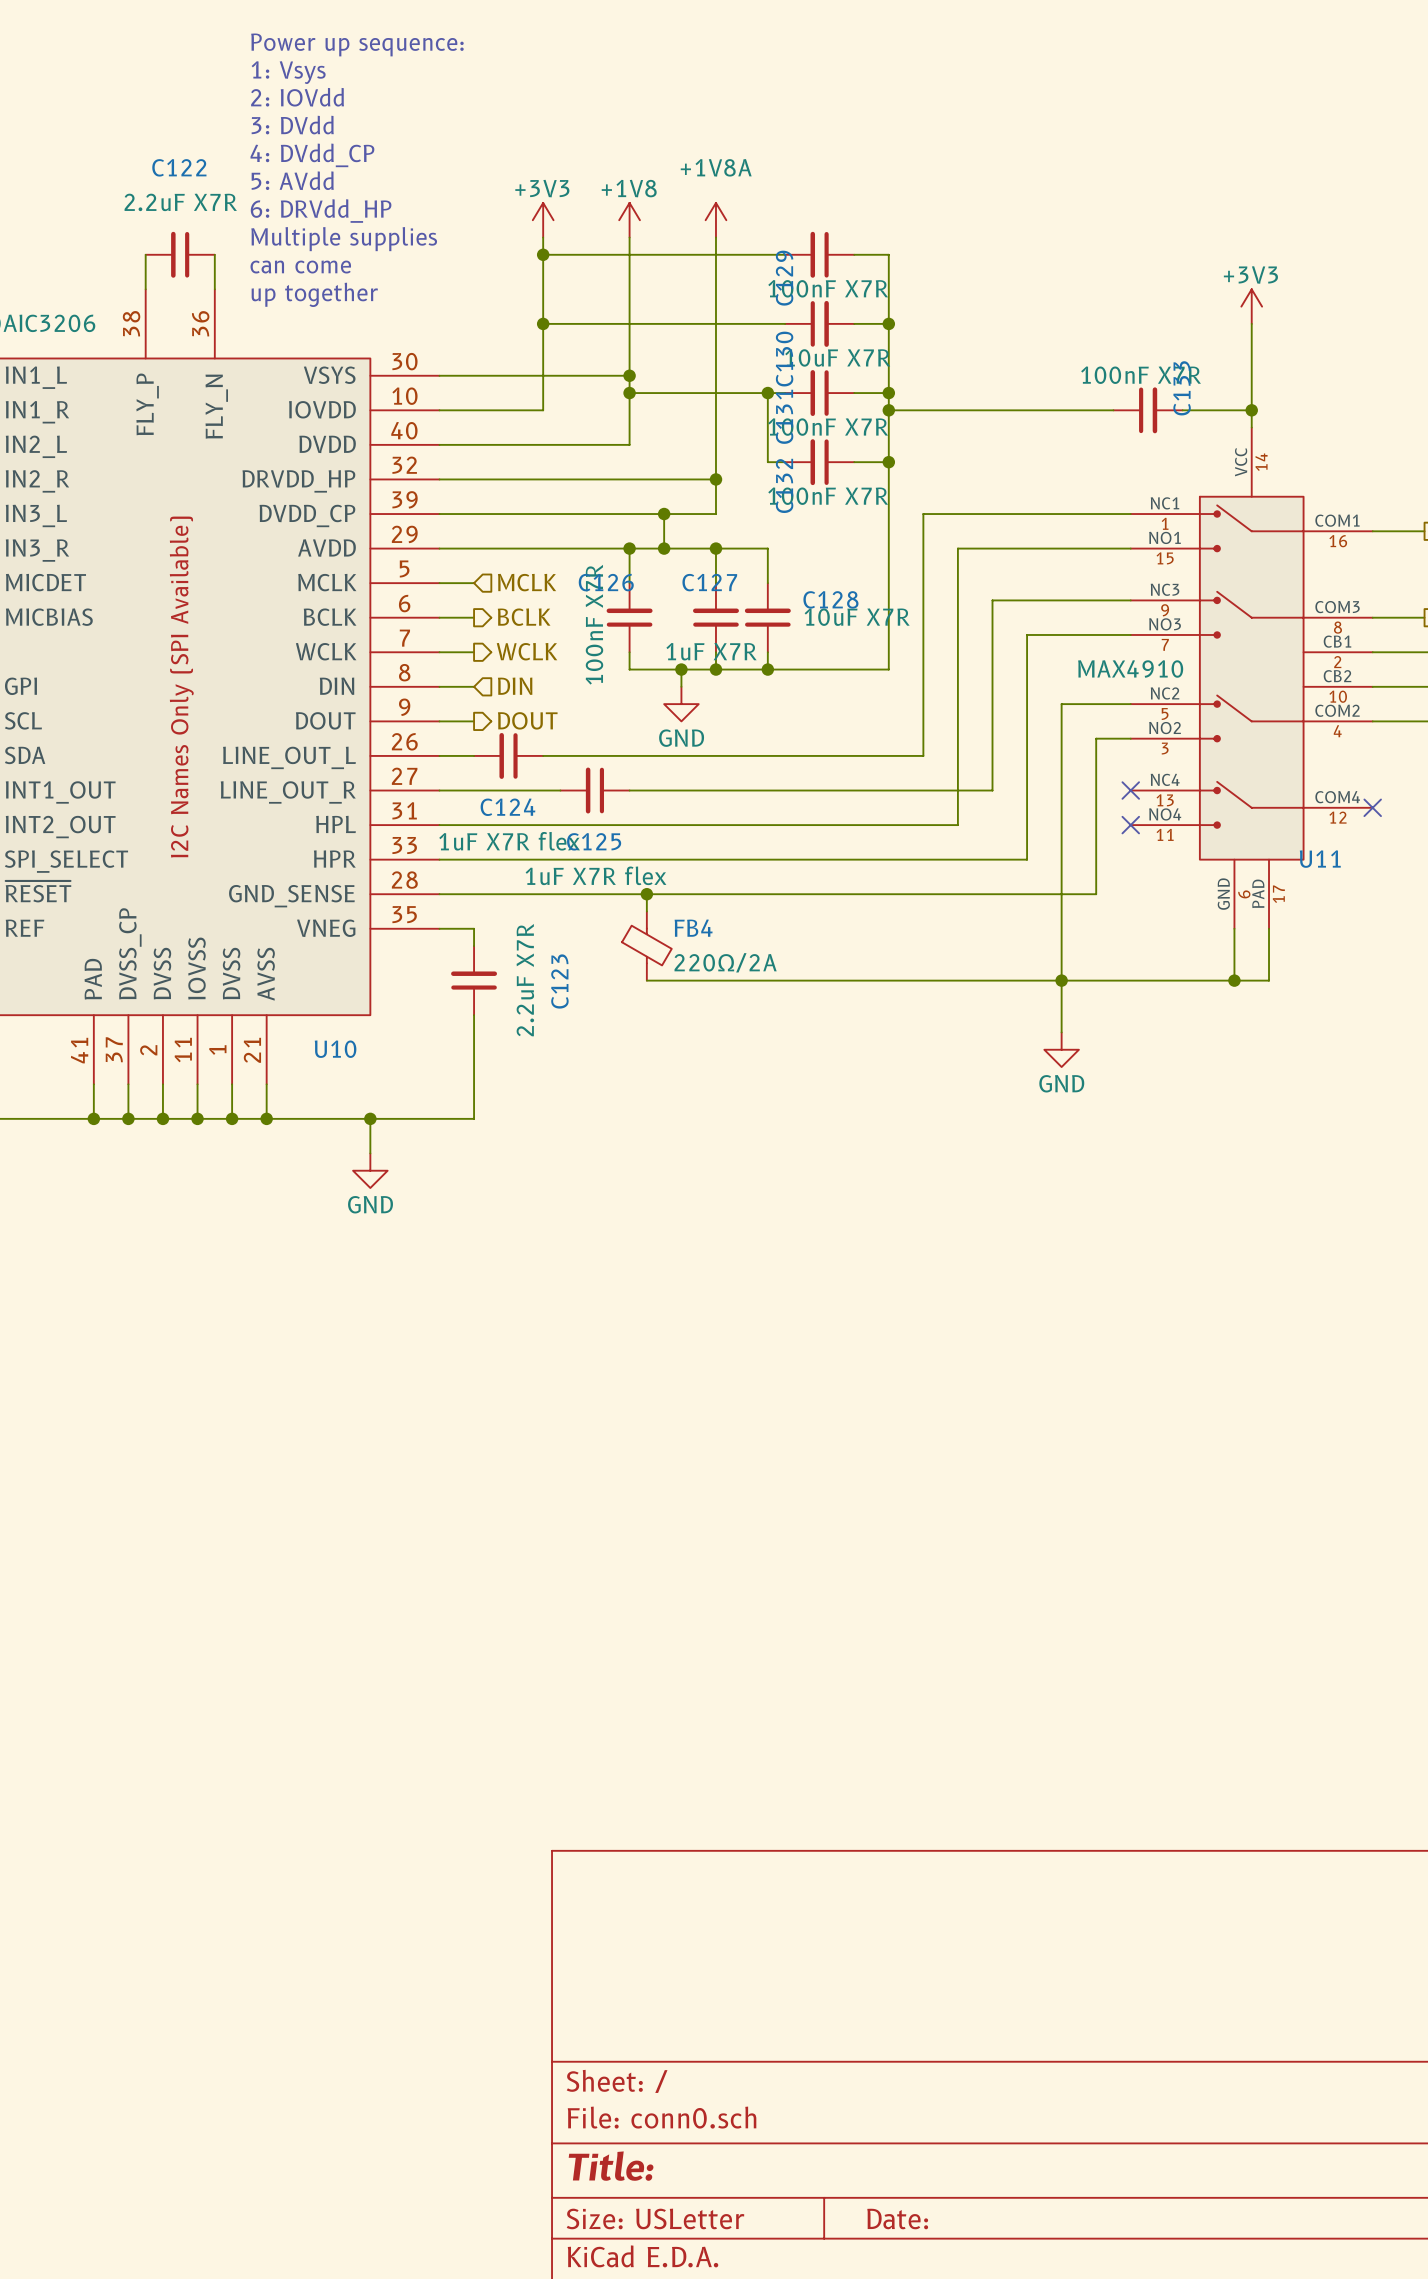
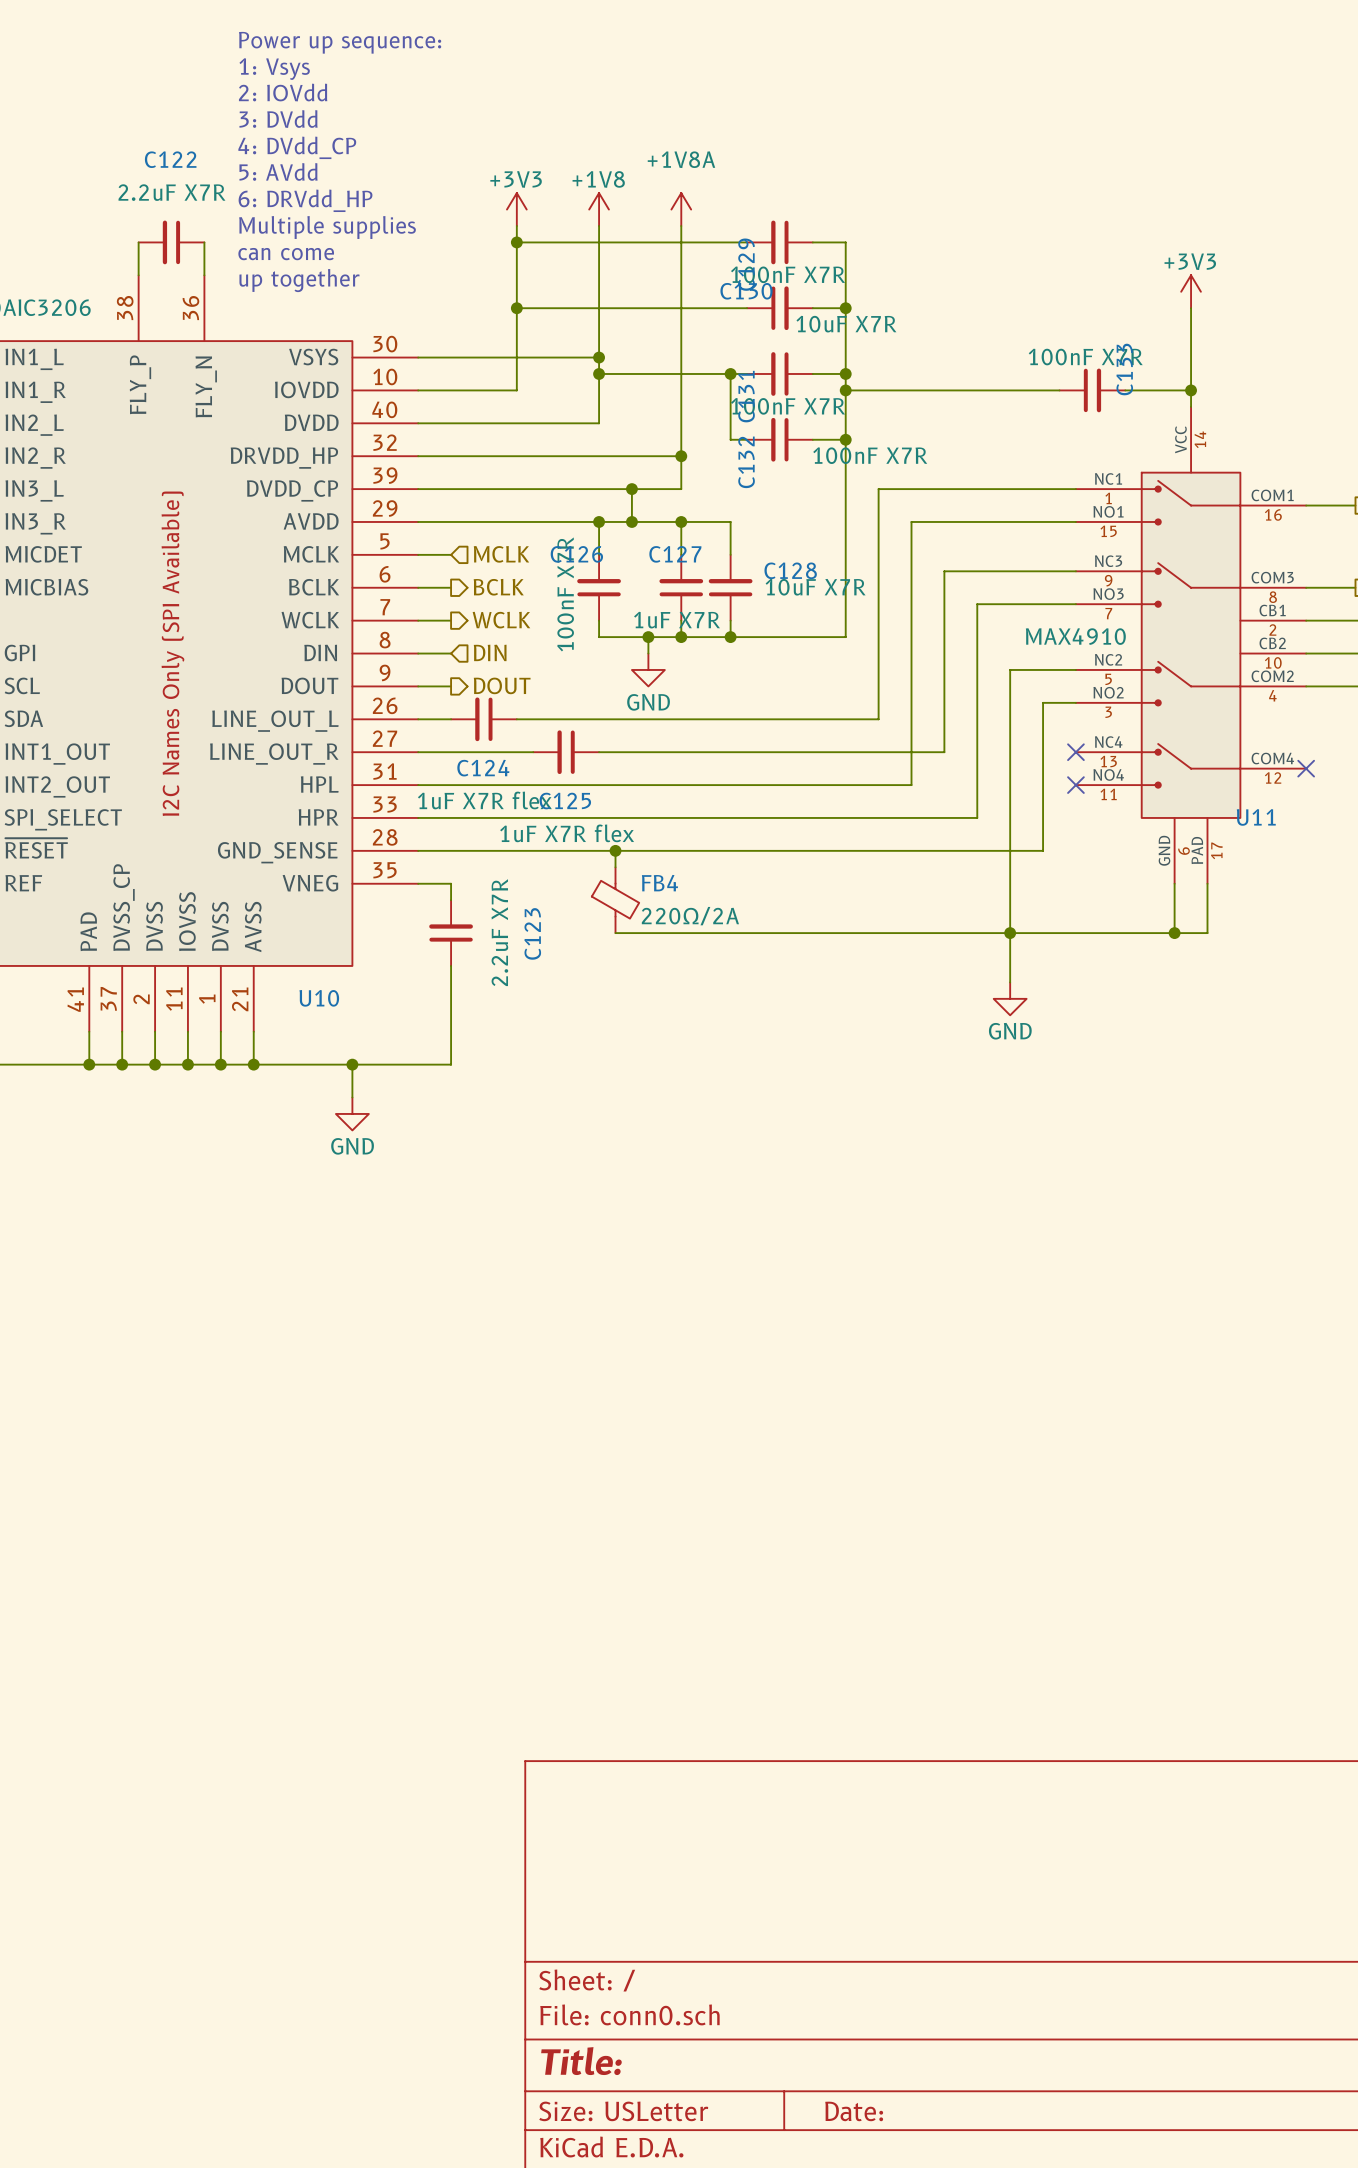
C130 value position: 10uF X7R (837, 357) -> 10uF X7R (846, 324)
C130 name rotation: 0° (784, 359) -> 90° clockwise (746, 291)
C132 value position: 100nF X7R (828, 496) -> 100nF X7R (870, 455)

